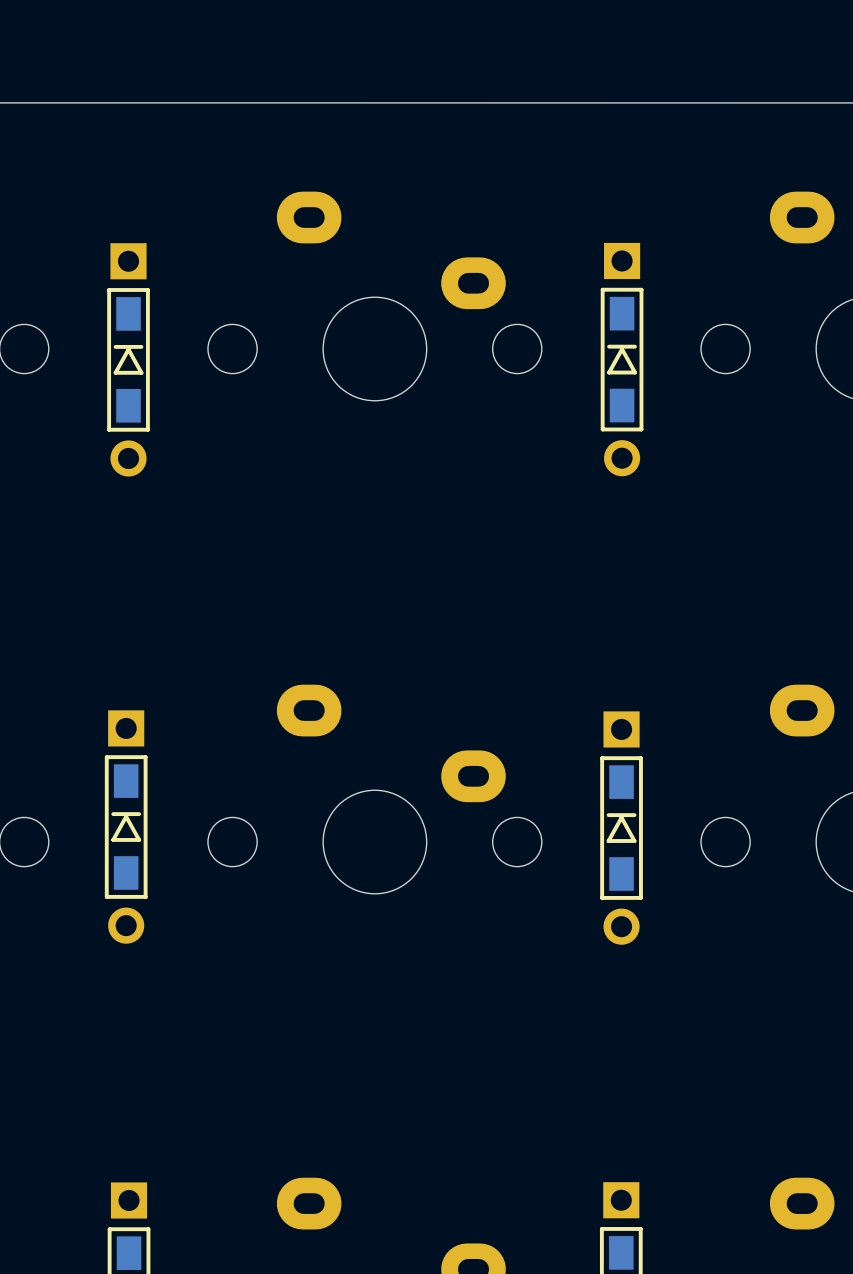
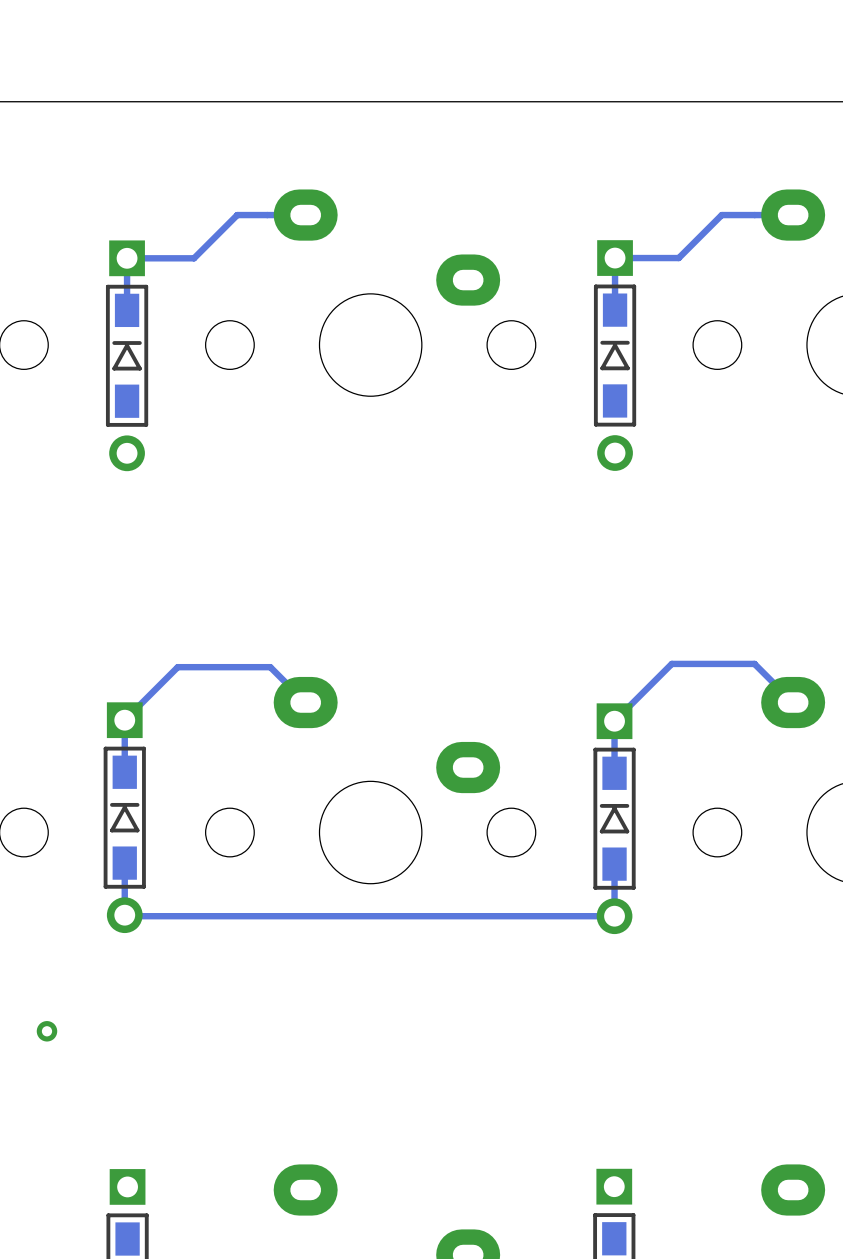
track: none -> (305, 215) (237, 215) (194, 258) (127, 258) (127, 310)
track: none -> (793, 215) (721, 215) (678, 258) (615, 258) (615, 310)
track: none -> (305, 702) (270, 667) (177, 667) (124, 720) (124, 772)
track: none -> (793, 702) (754, 663) (671, 663) (614, 721) (614, 773)
track: none -> (124, 863) (125, 916) (614, 916) (614, 864)
via: none -> (46, 1031)

